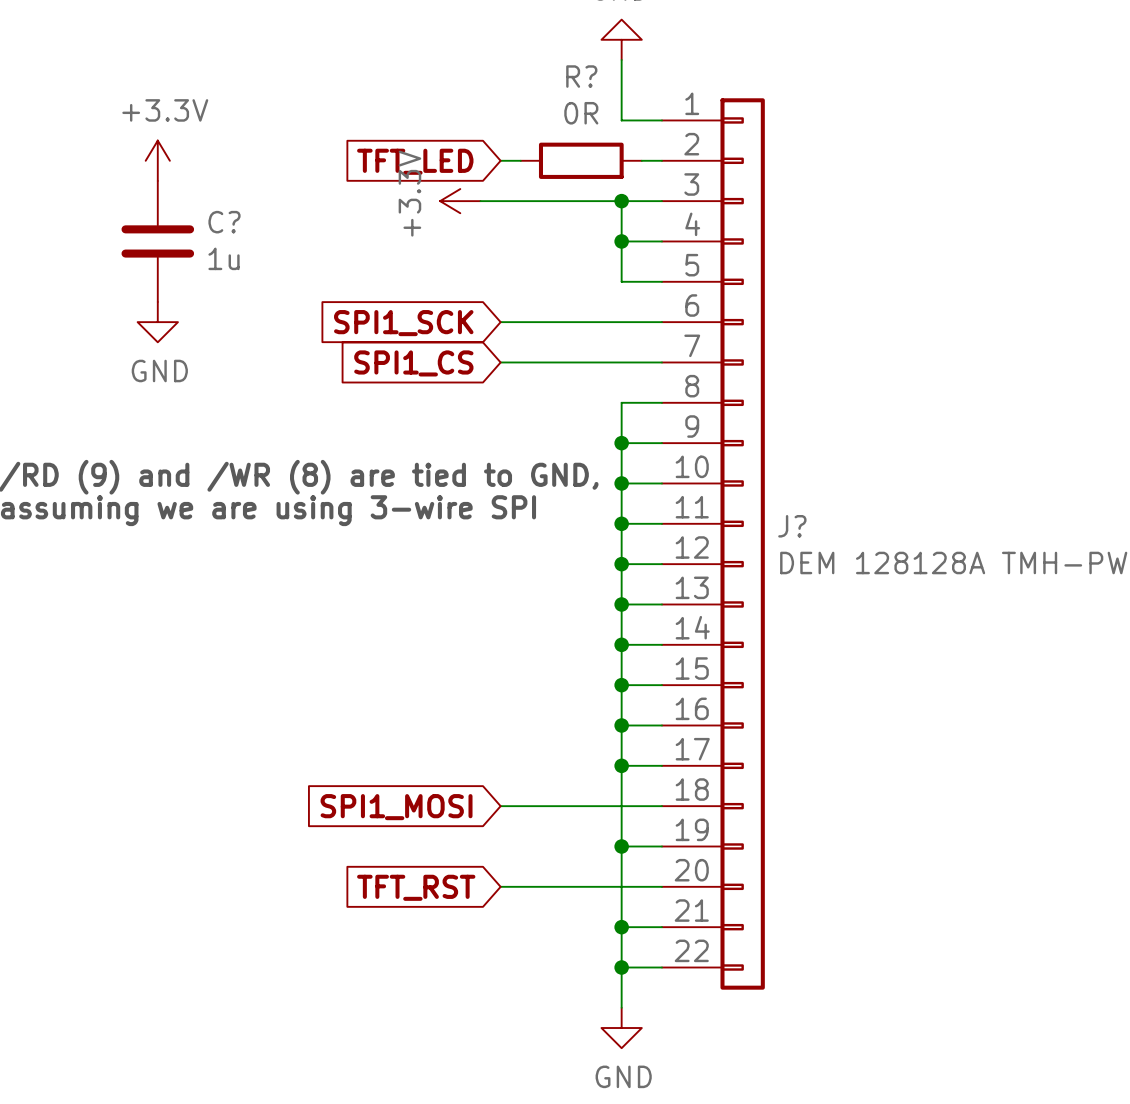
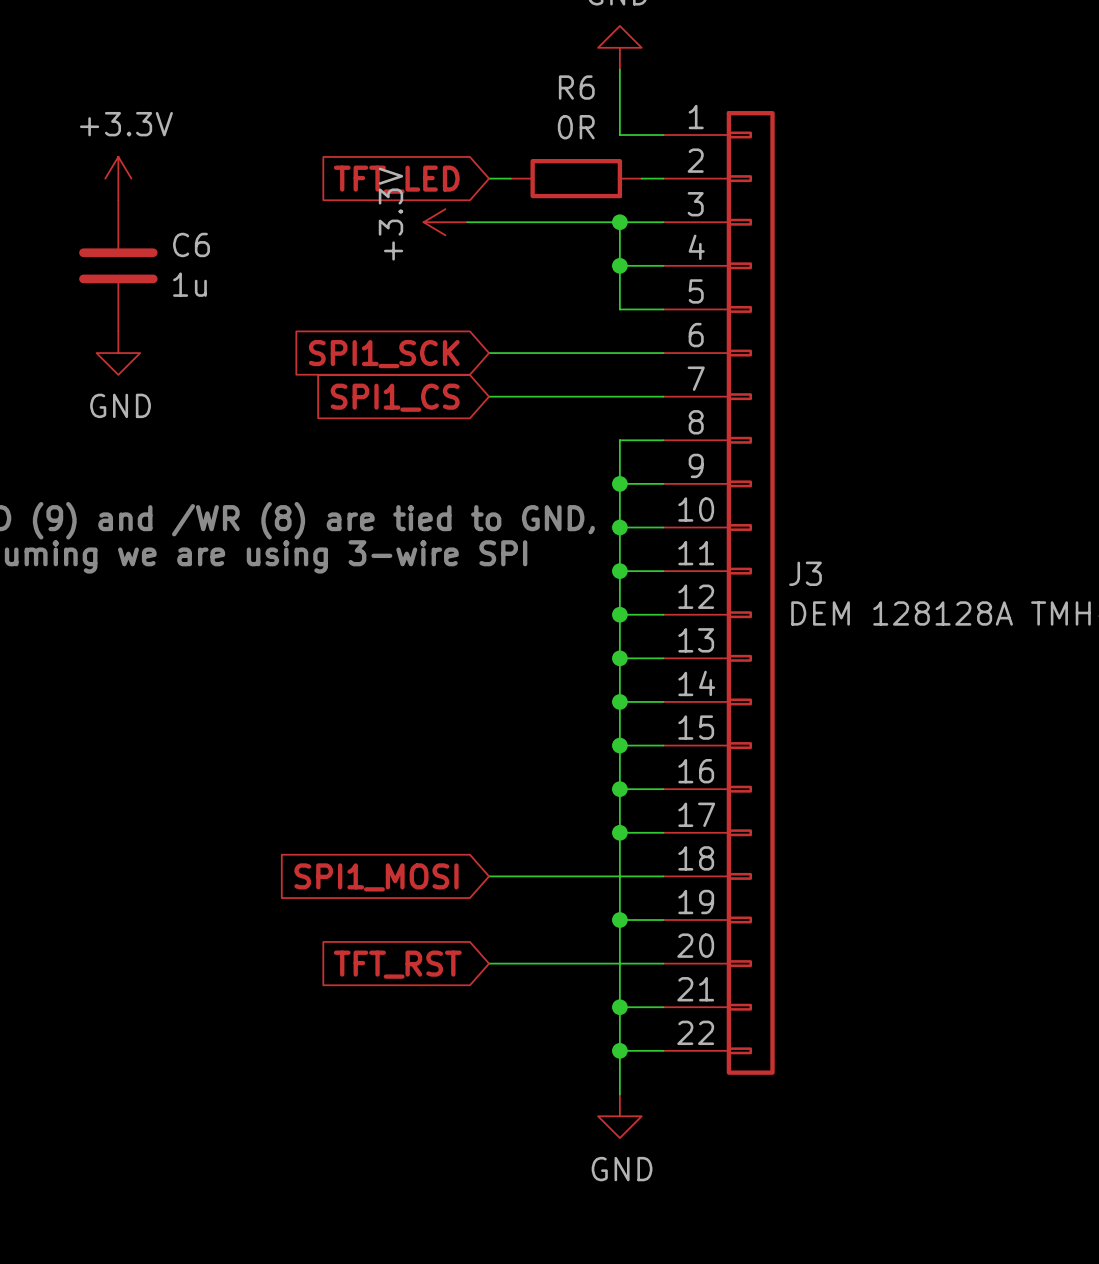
R? name: R? (581, 76) -> R6 (576, 87)
C? name: C? (224, 222) -> C6 (191, 244)
J? name: J? (792, 526) -> J3 (805, 573)

